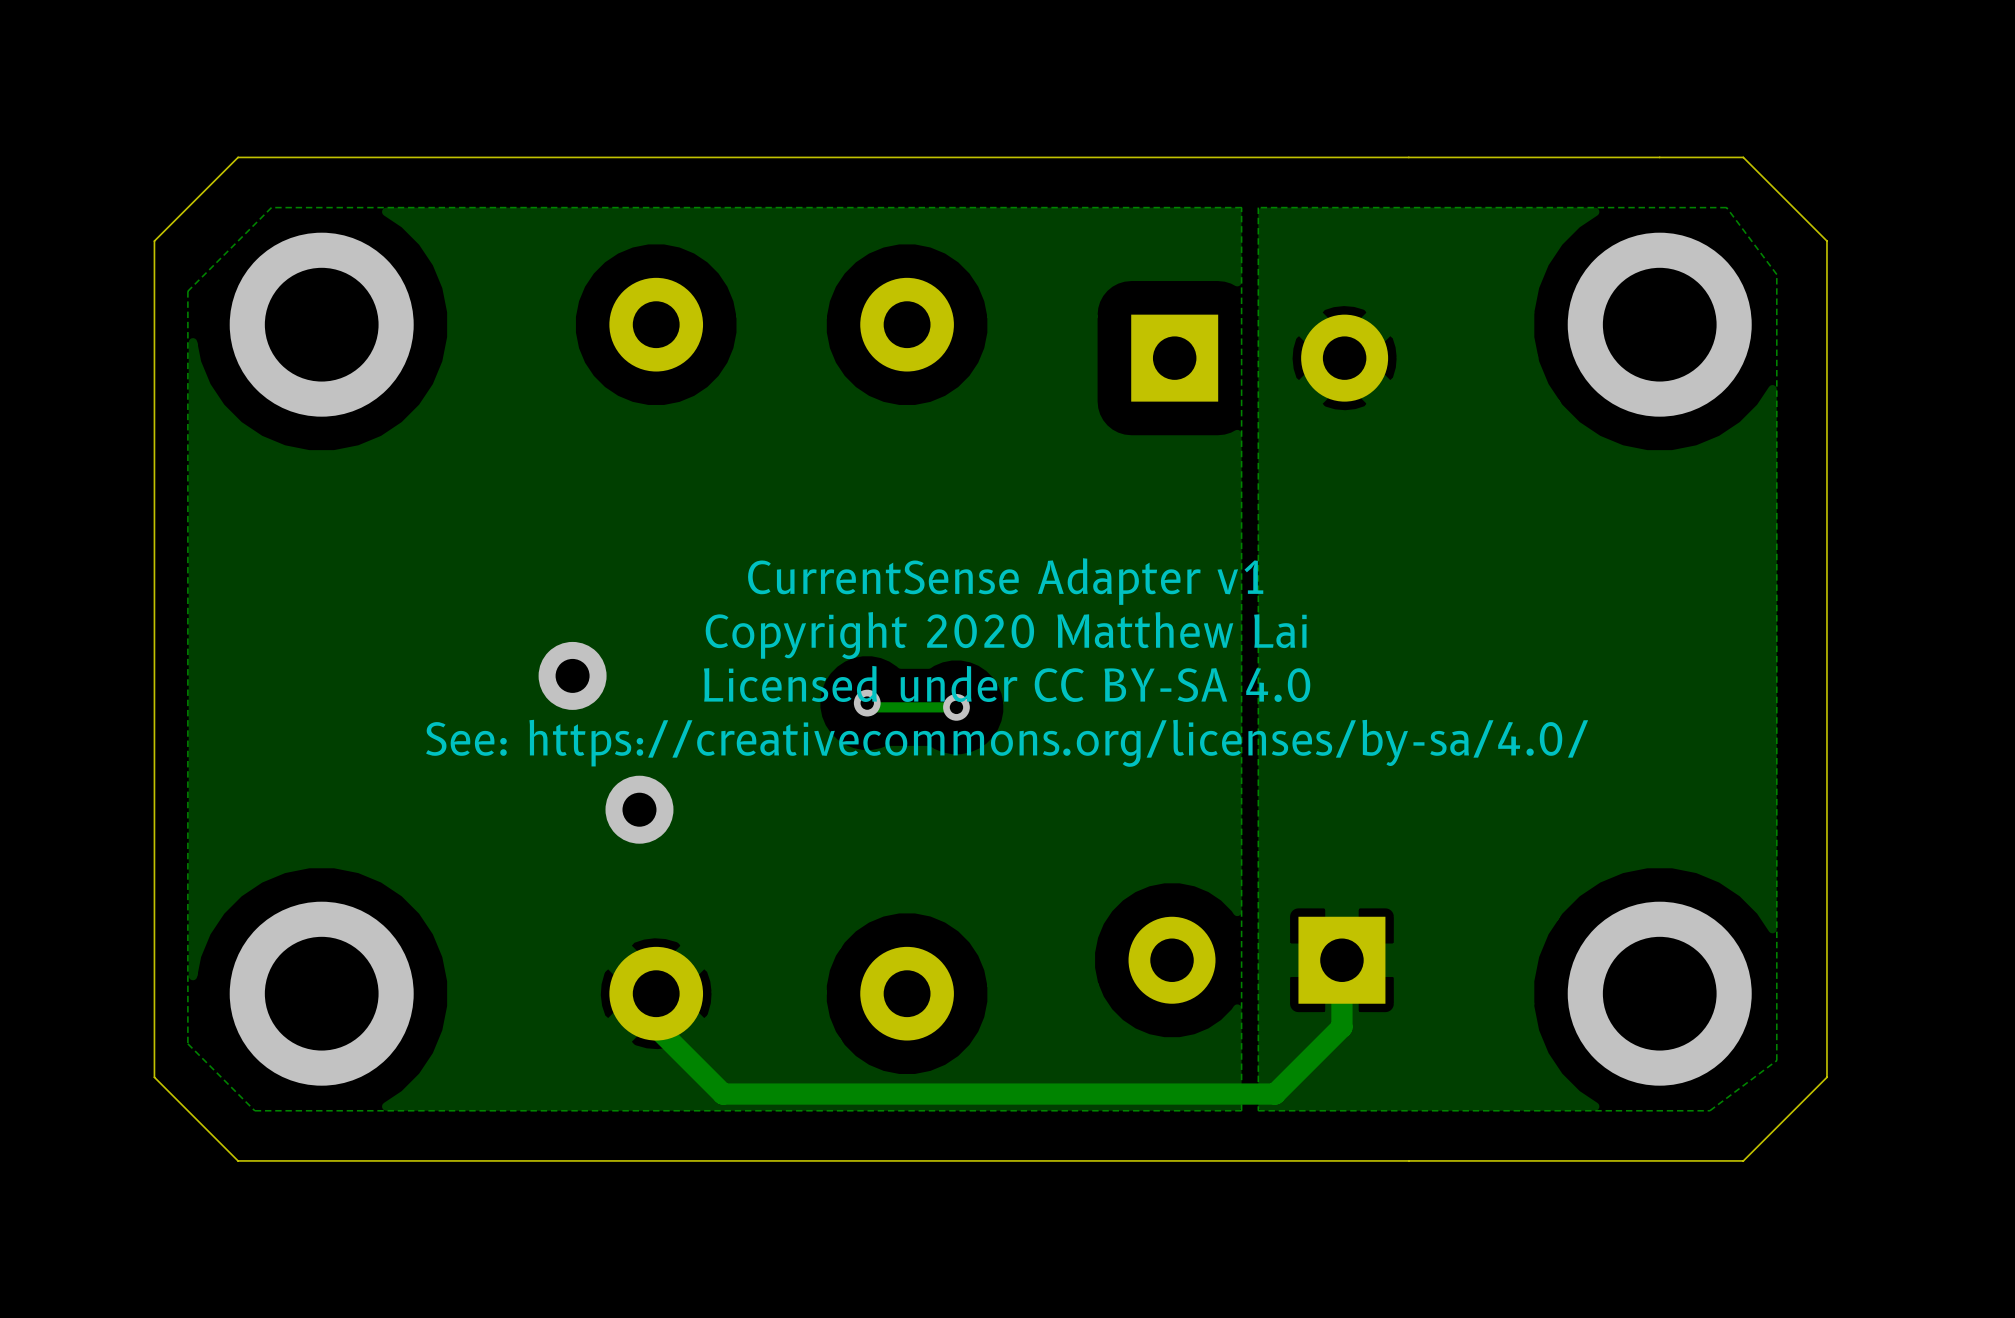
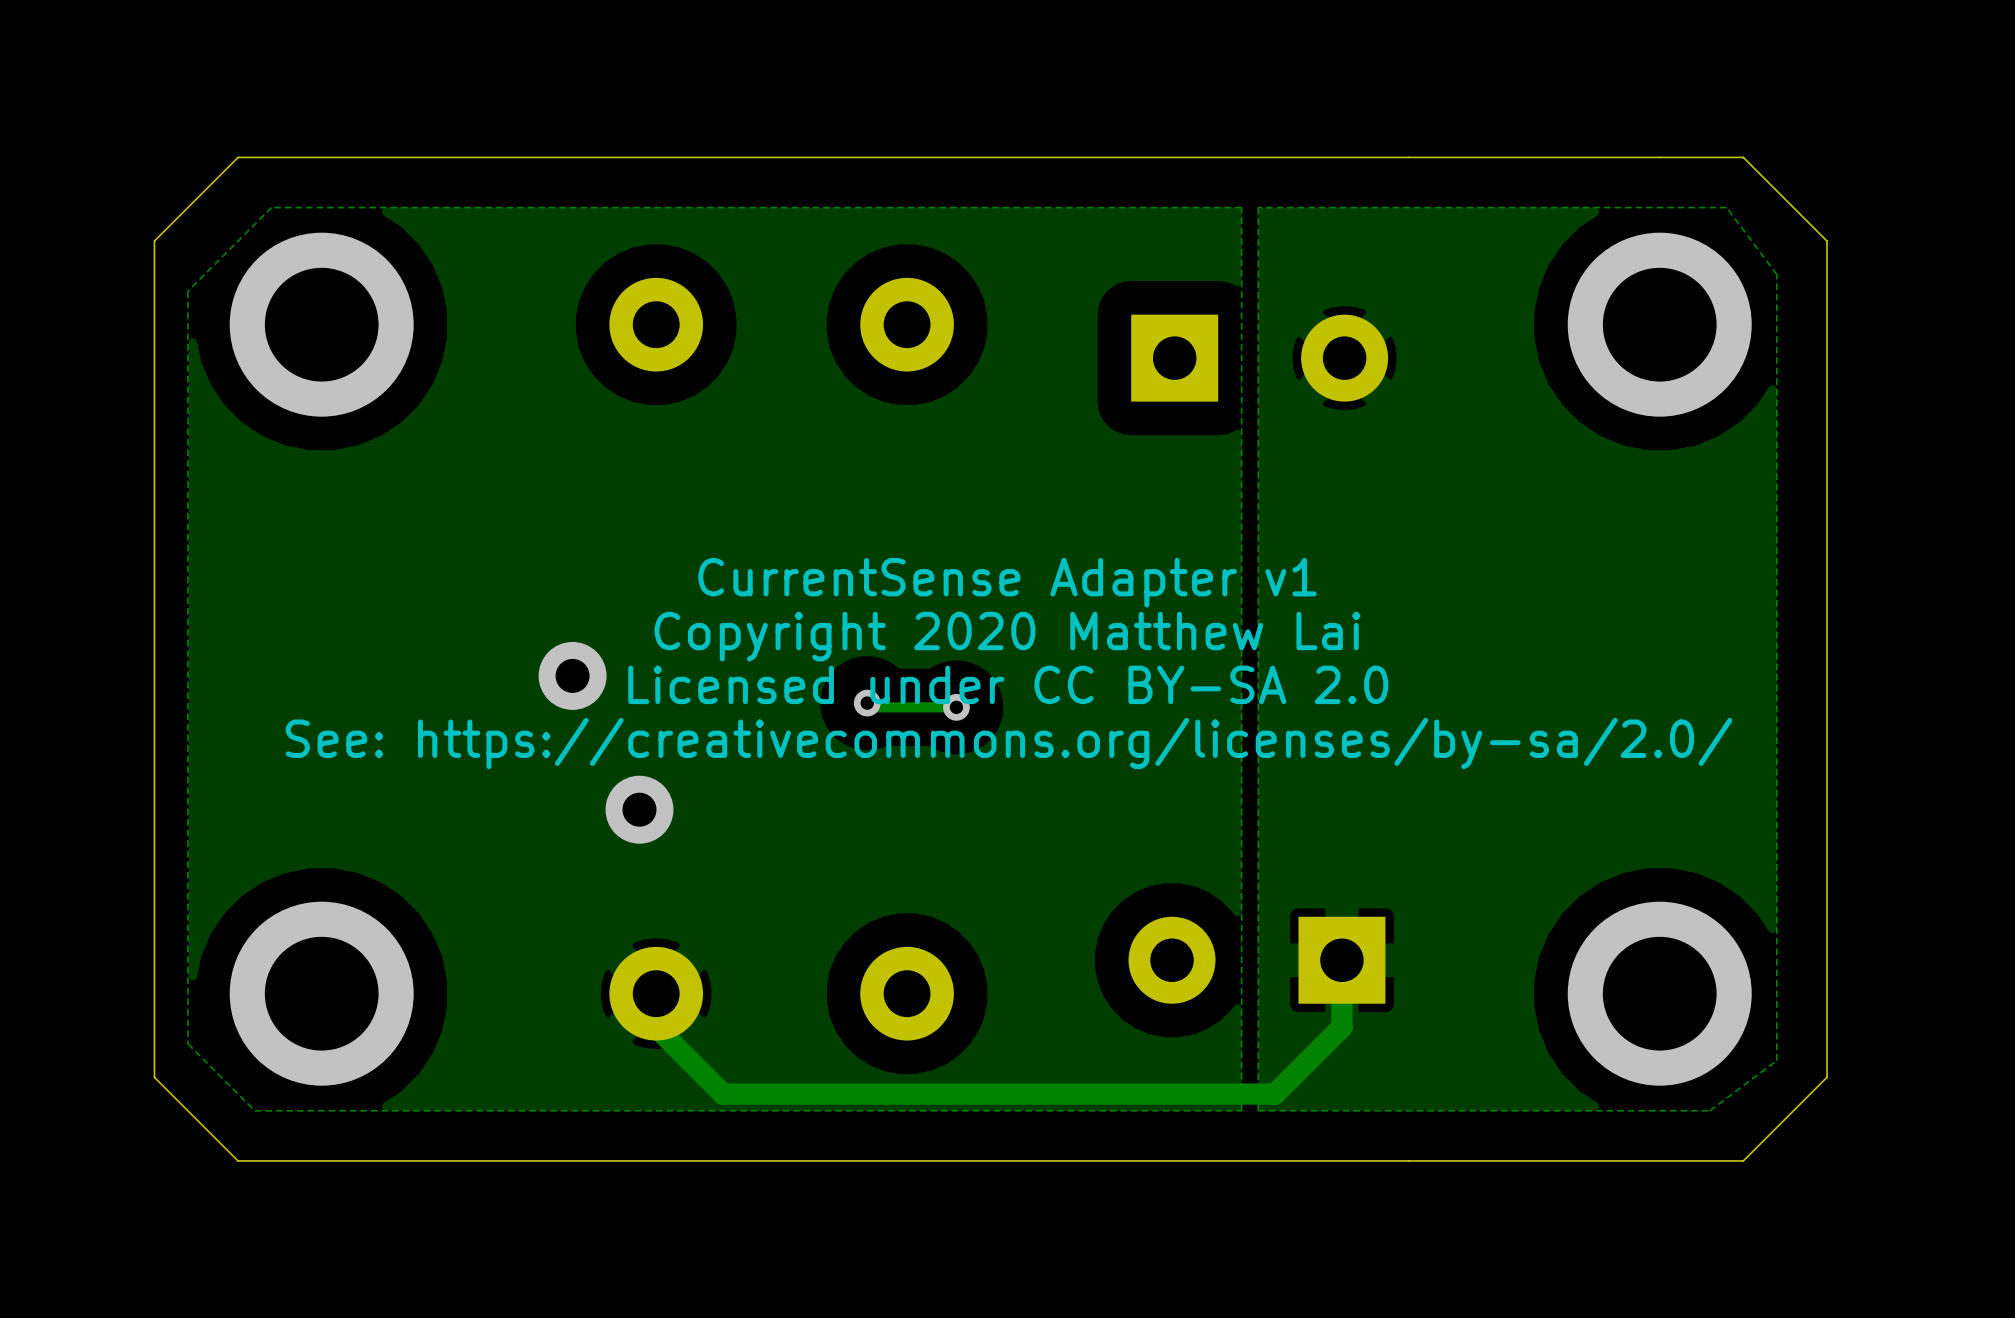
text: Licensed under CC BY-SA 4.0 (1007, 683) -> Licensed under CC BY-SA 2.0 (1008, 684)
text: See: https://creativecommons.org/licenses/by-sa/4.0/ (1007, 743) -> See: https://creativecommons.org/licenses/by-sa/2.0/ (1009, 743)

